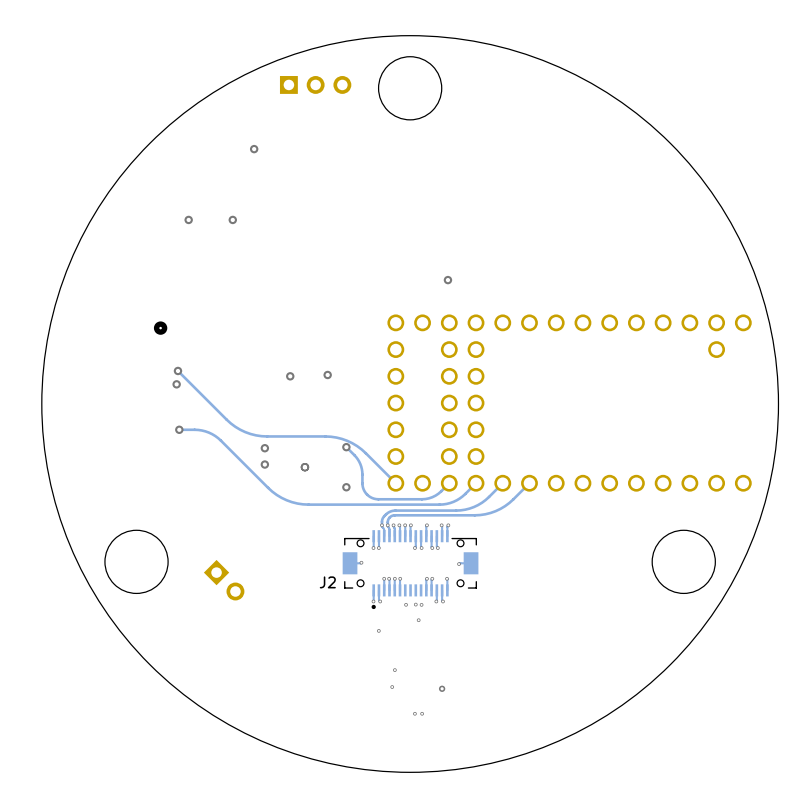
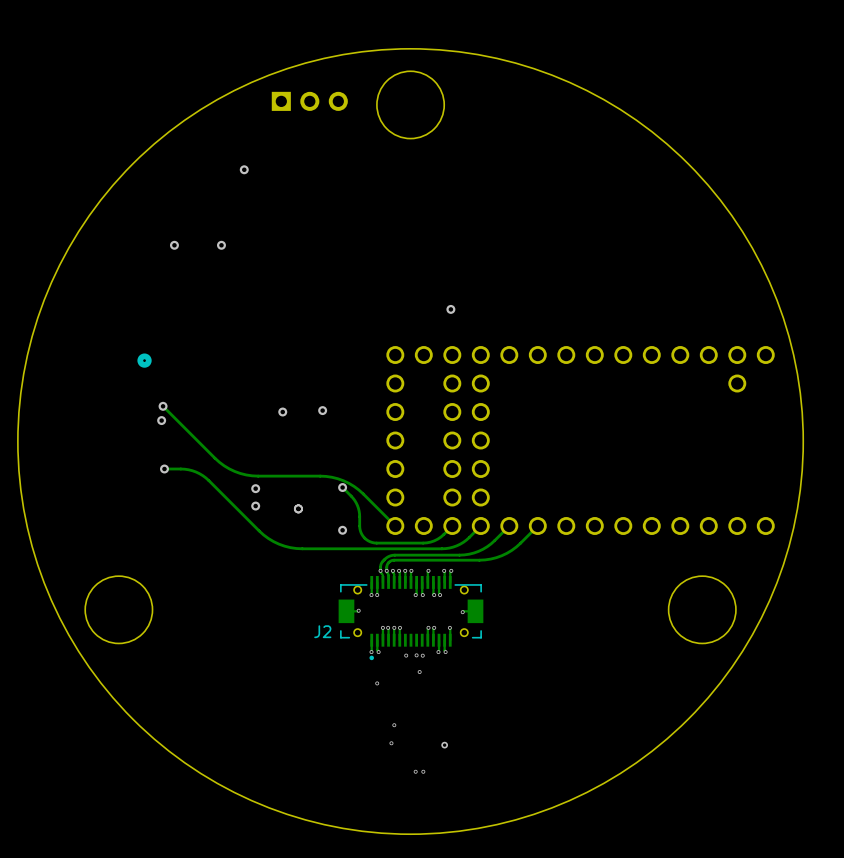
part: (224, 580) -> none

